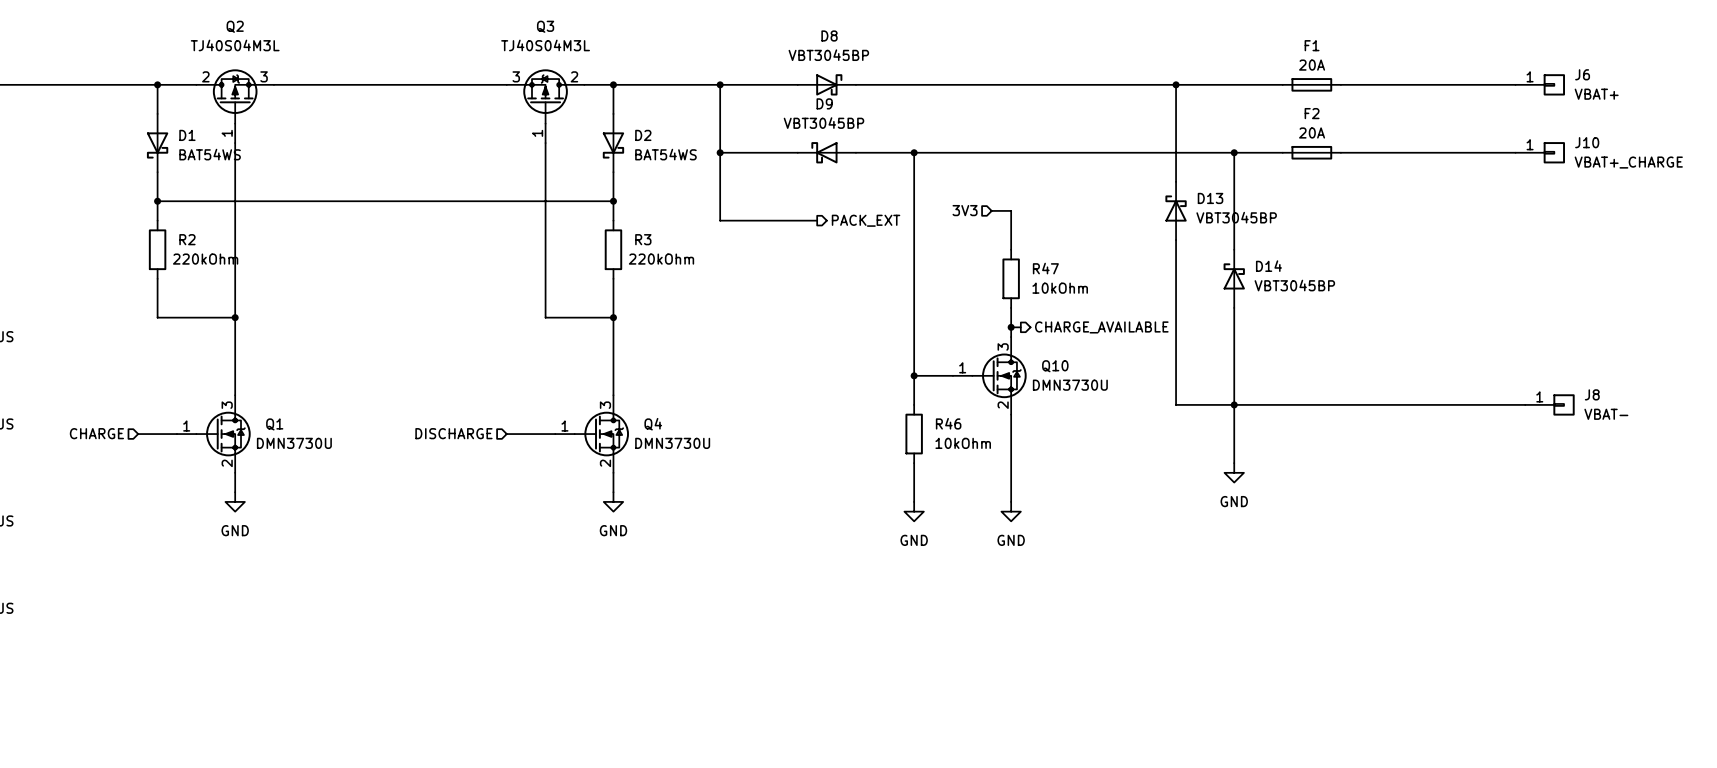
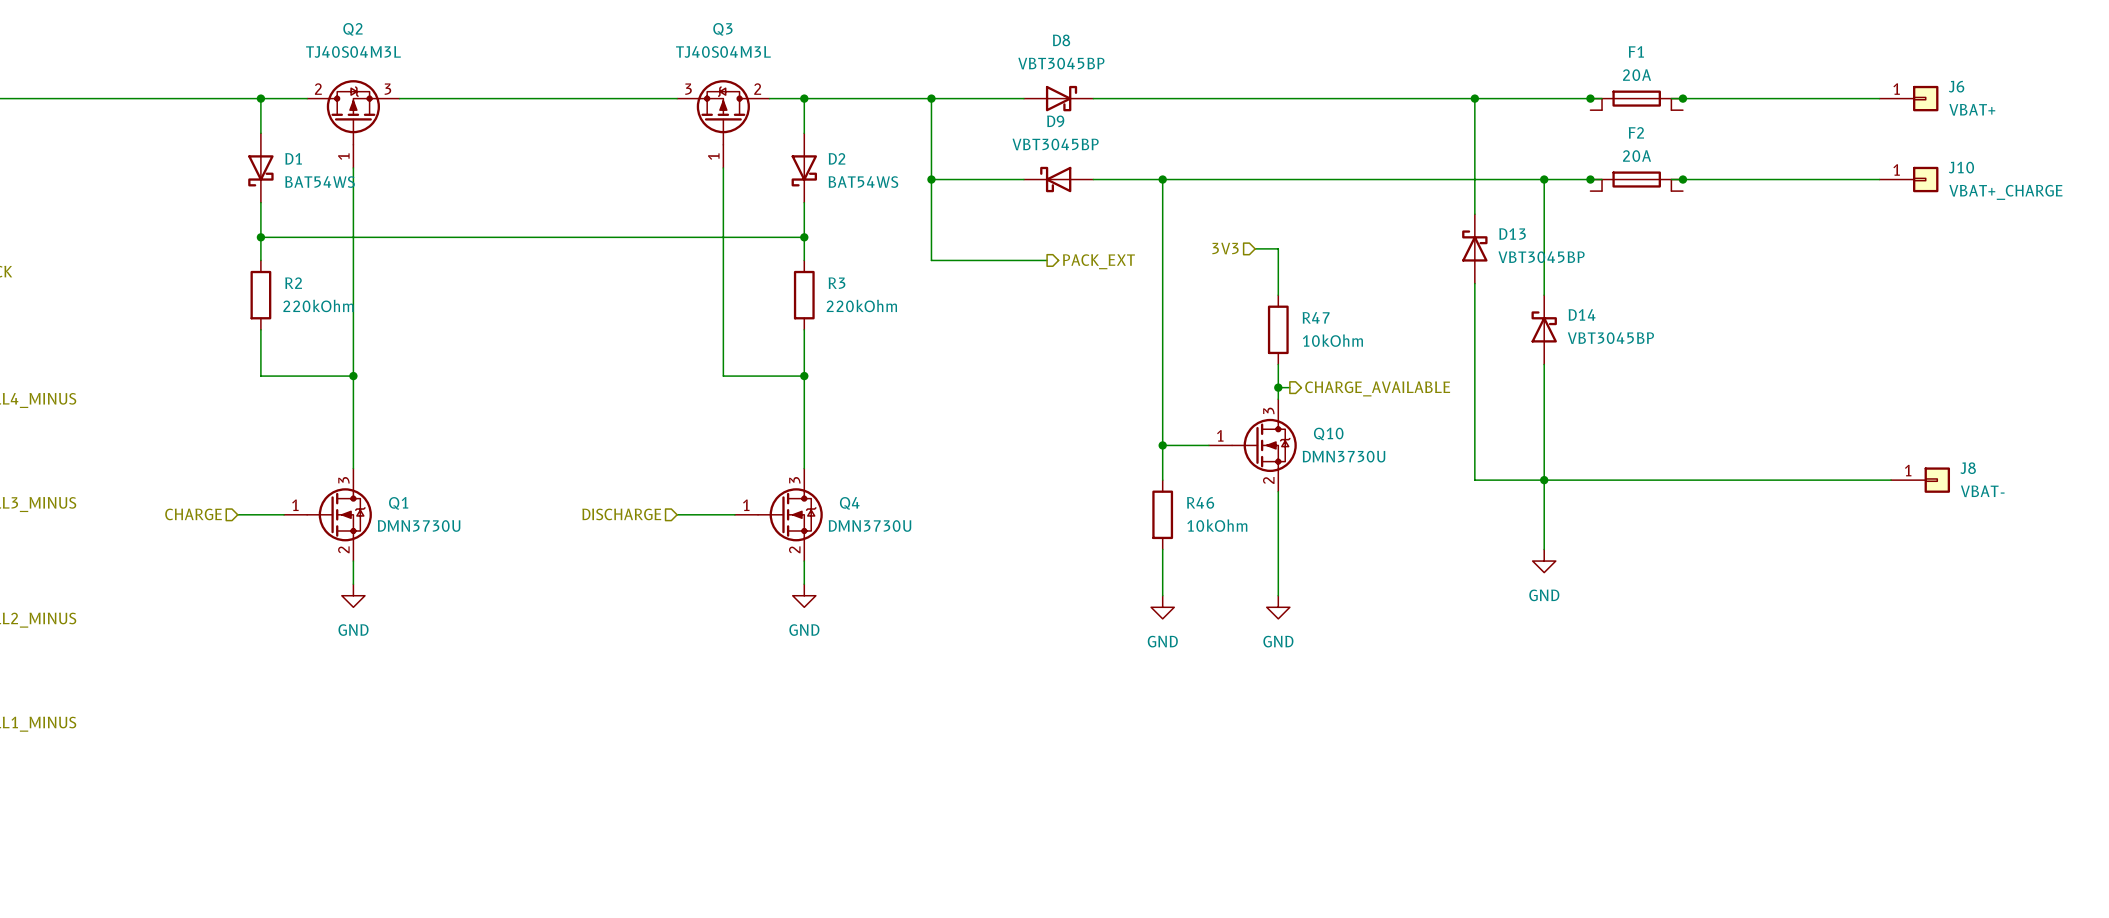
F1 symbol: [1282, 78, 1341, 92] -> [1590, 90, 1683, 111]
junction: none -> (1590, 98)
junction: none -> (1682, 98)
F2 symbol: [1282, 145, 1341, 160] -> [1590, 171, 1683, 192]
junction: none -> (1590, 179)
junction: none -> (1682, 179)

